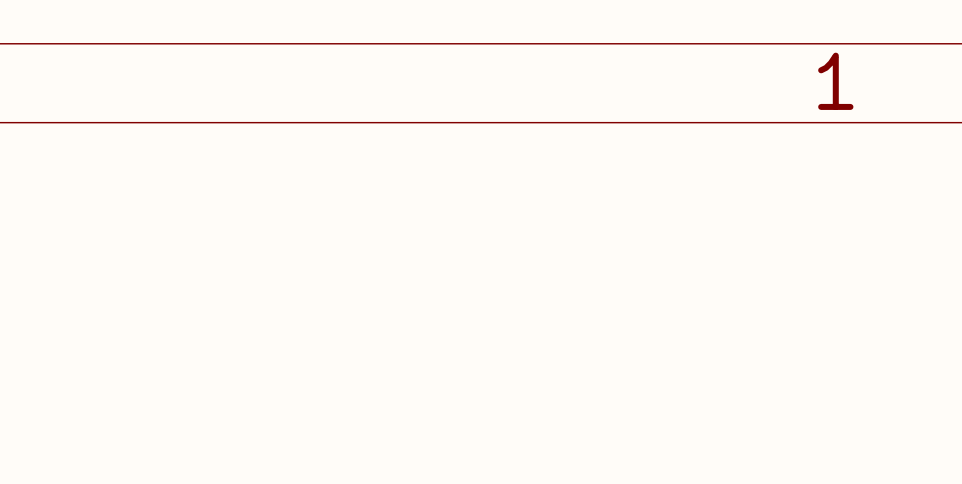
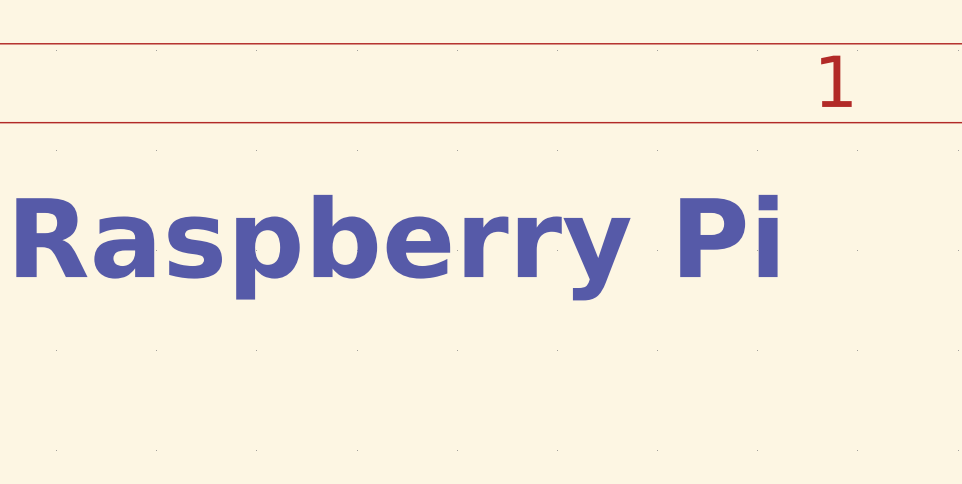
text: none -> Raspberry Pi (396, 247)

